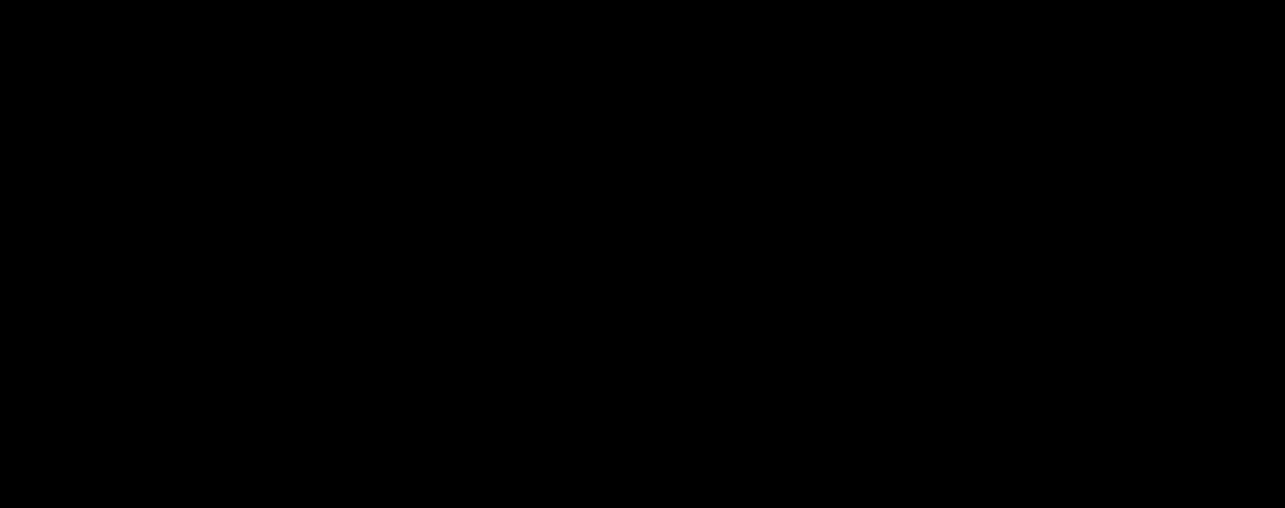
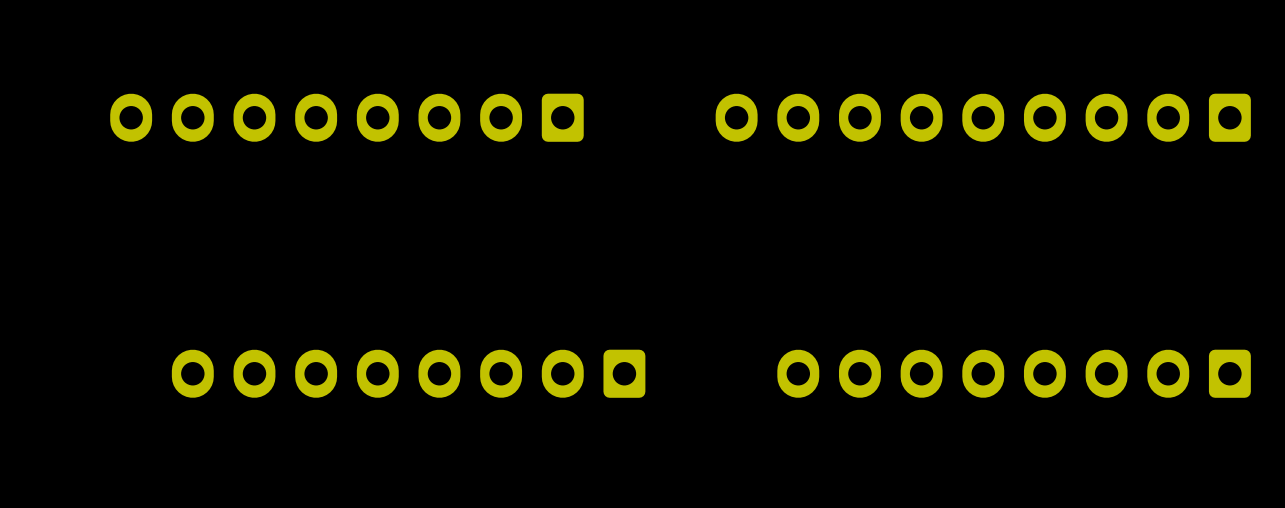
part: none -> (346, 117)
part: none -> (983, 117)
part: none -> (408, 373)
part: none -> (1014, 373)

